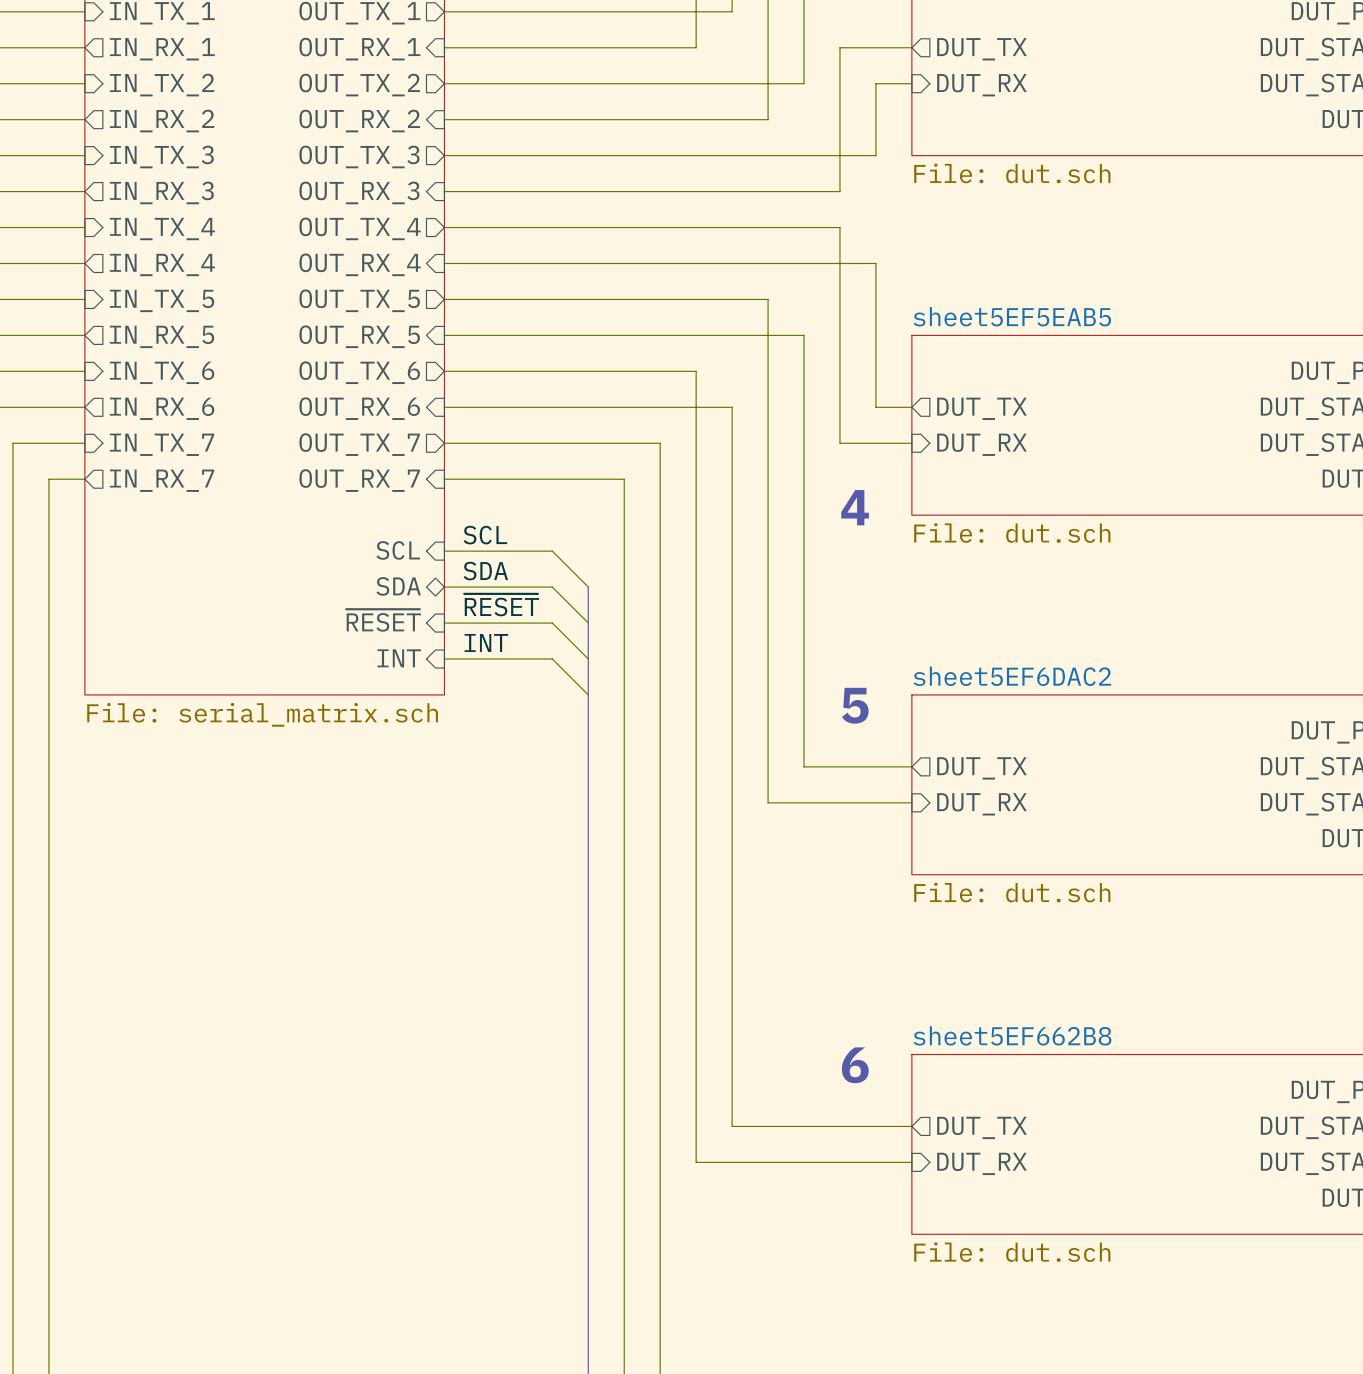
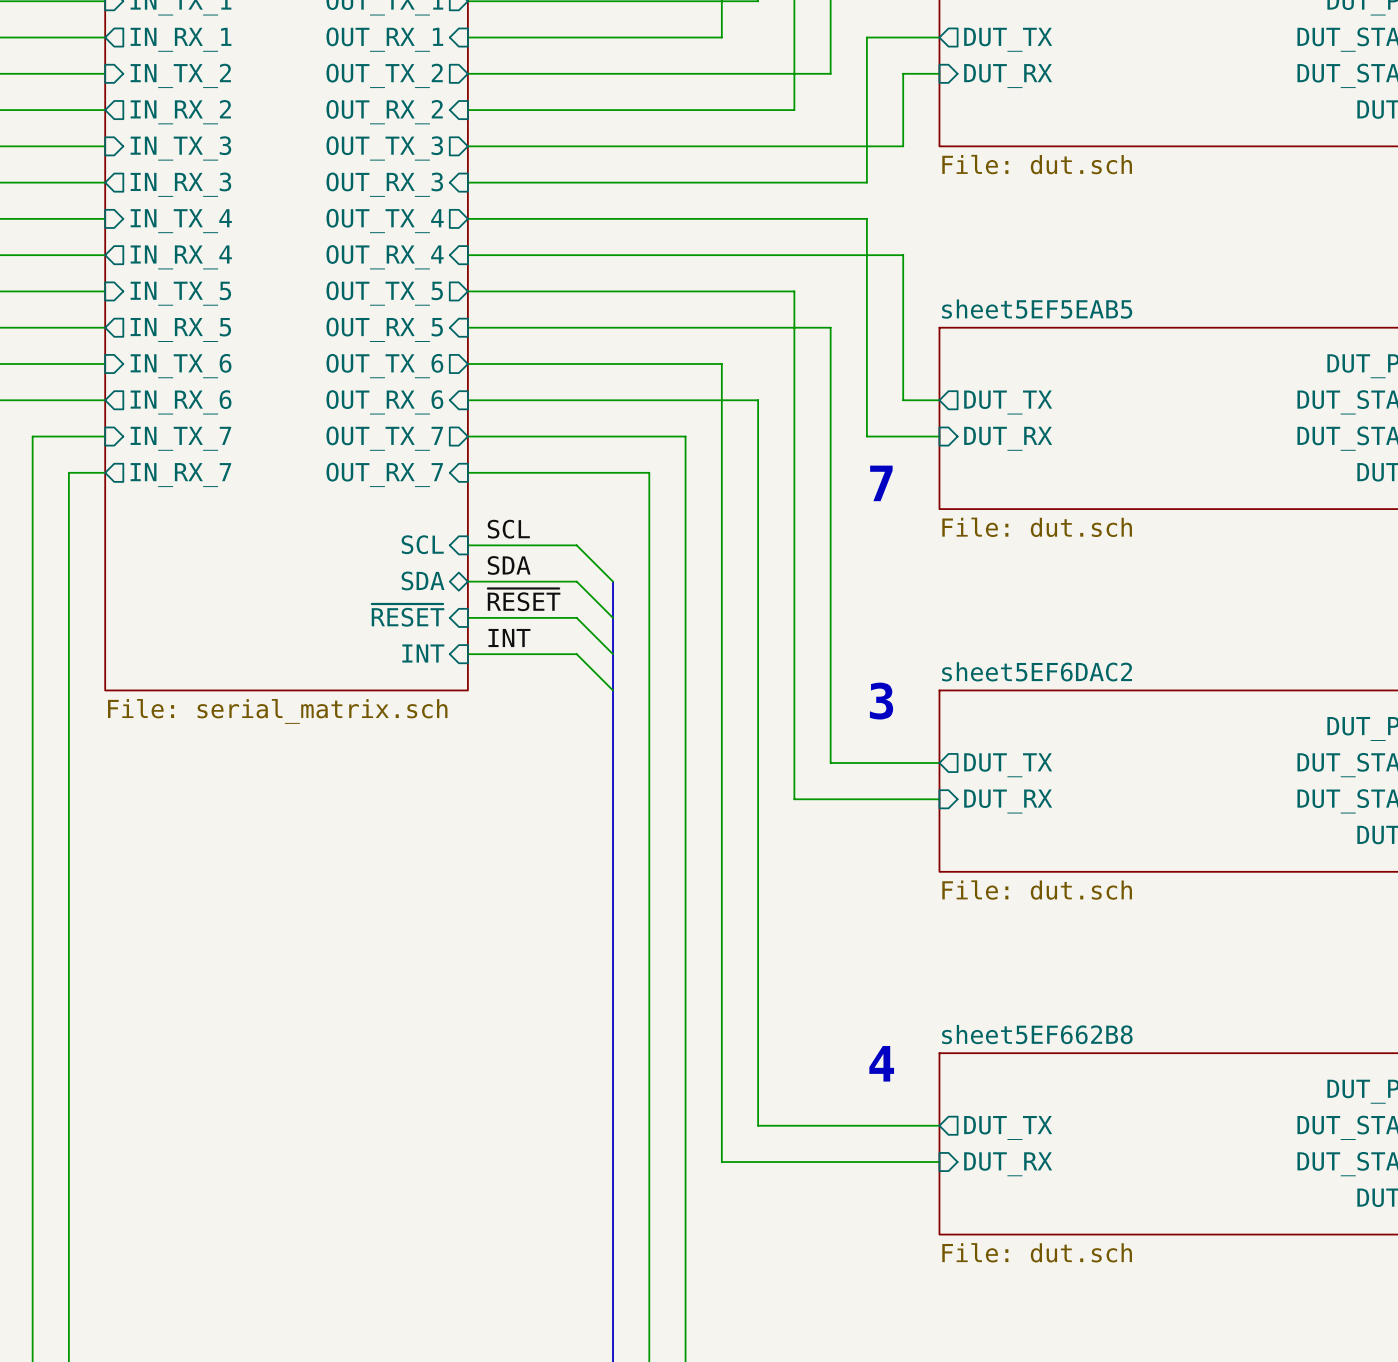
text: none -> 7 (881, 483)
text: 4 (855, 507) -> none
text: 5 (855, 705) -> 3 (881, 701)
text: 6 (855, 1065) -> 4 (881, 1063)

